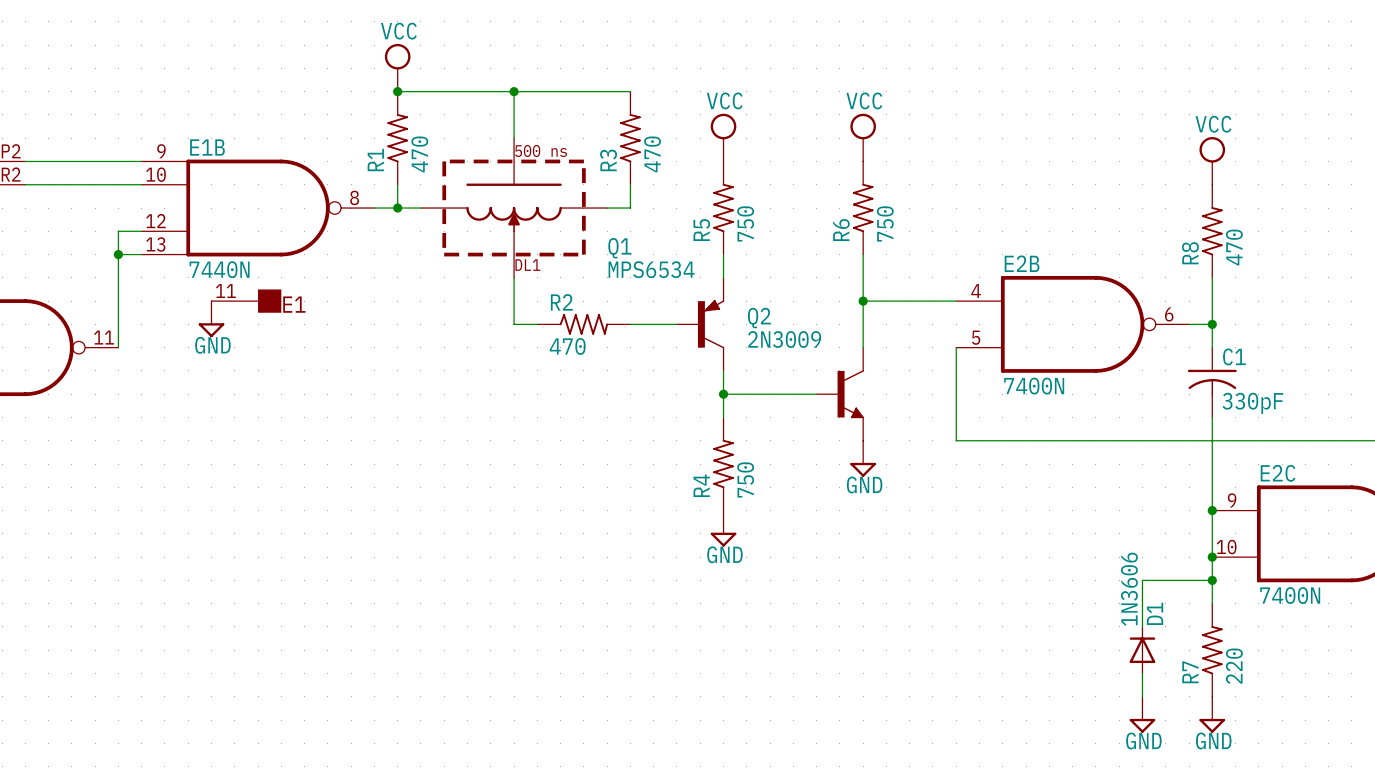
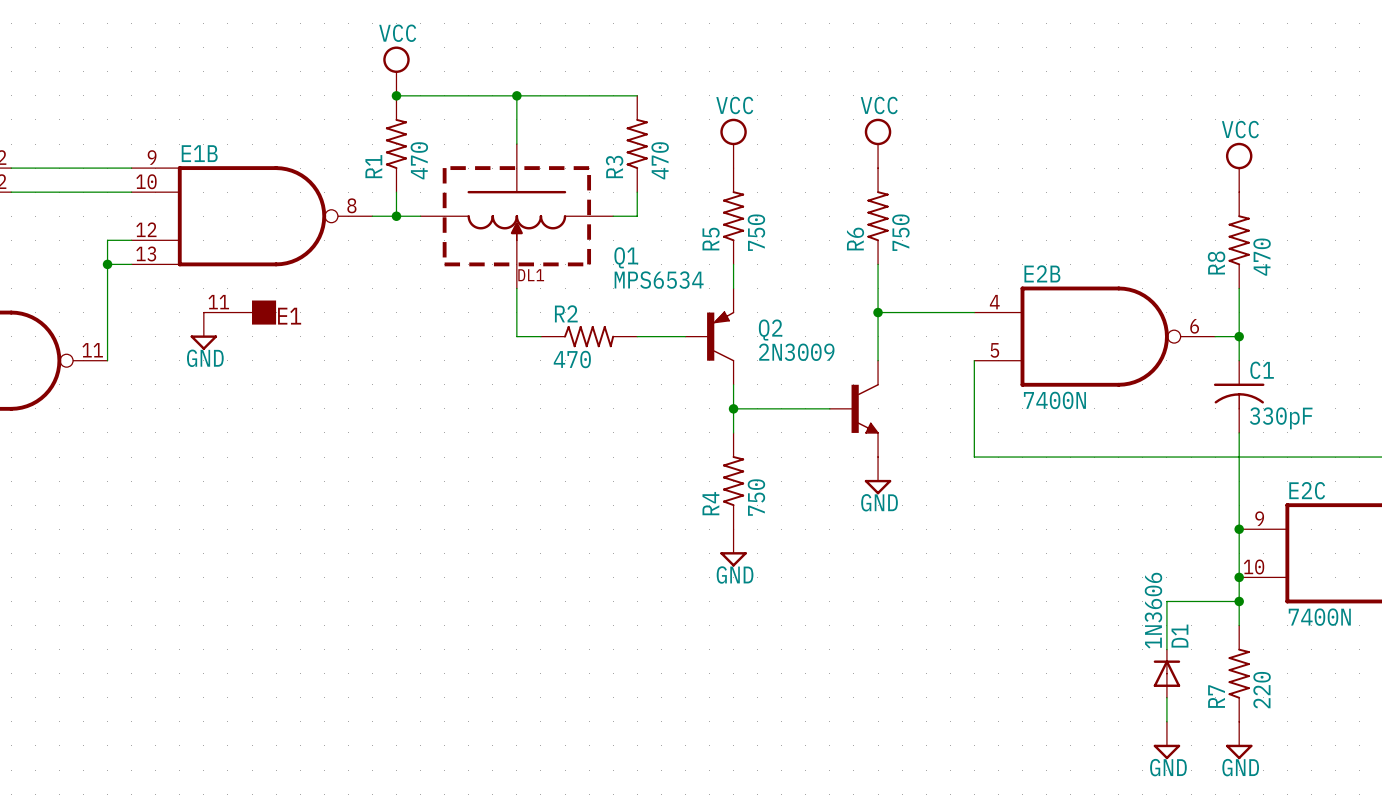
DL1 value: 500 ns (541, 150) -> none
E1B value: 7440N (219, 269) -> none

